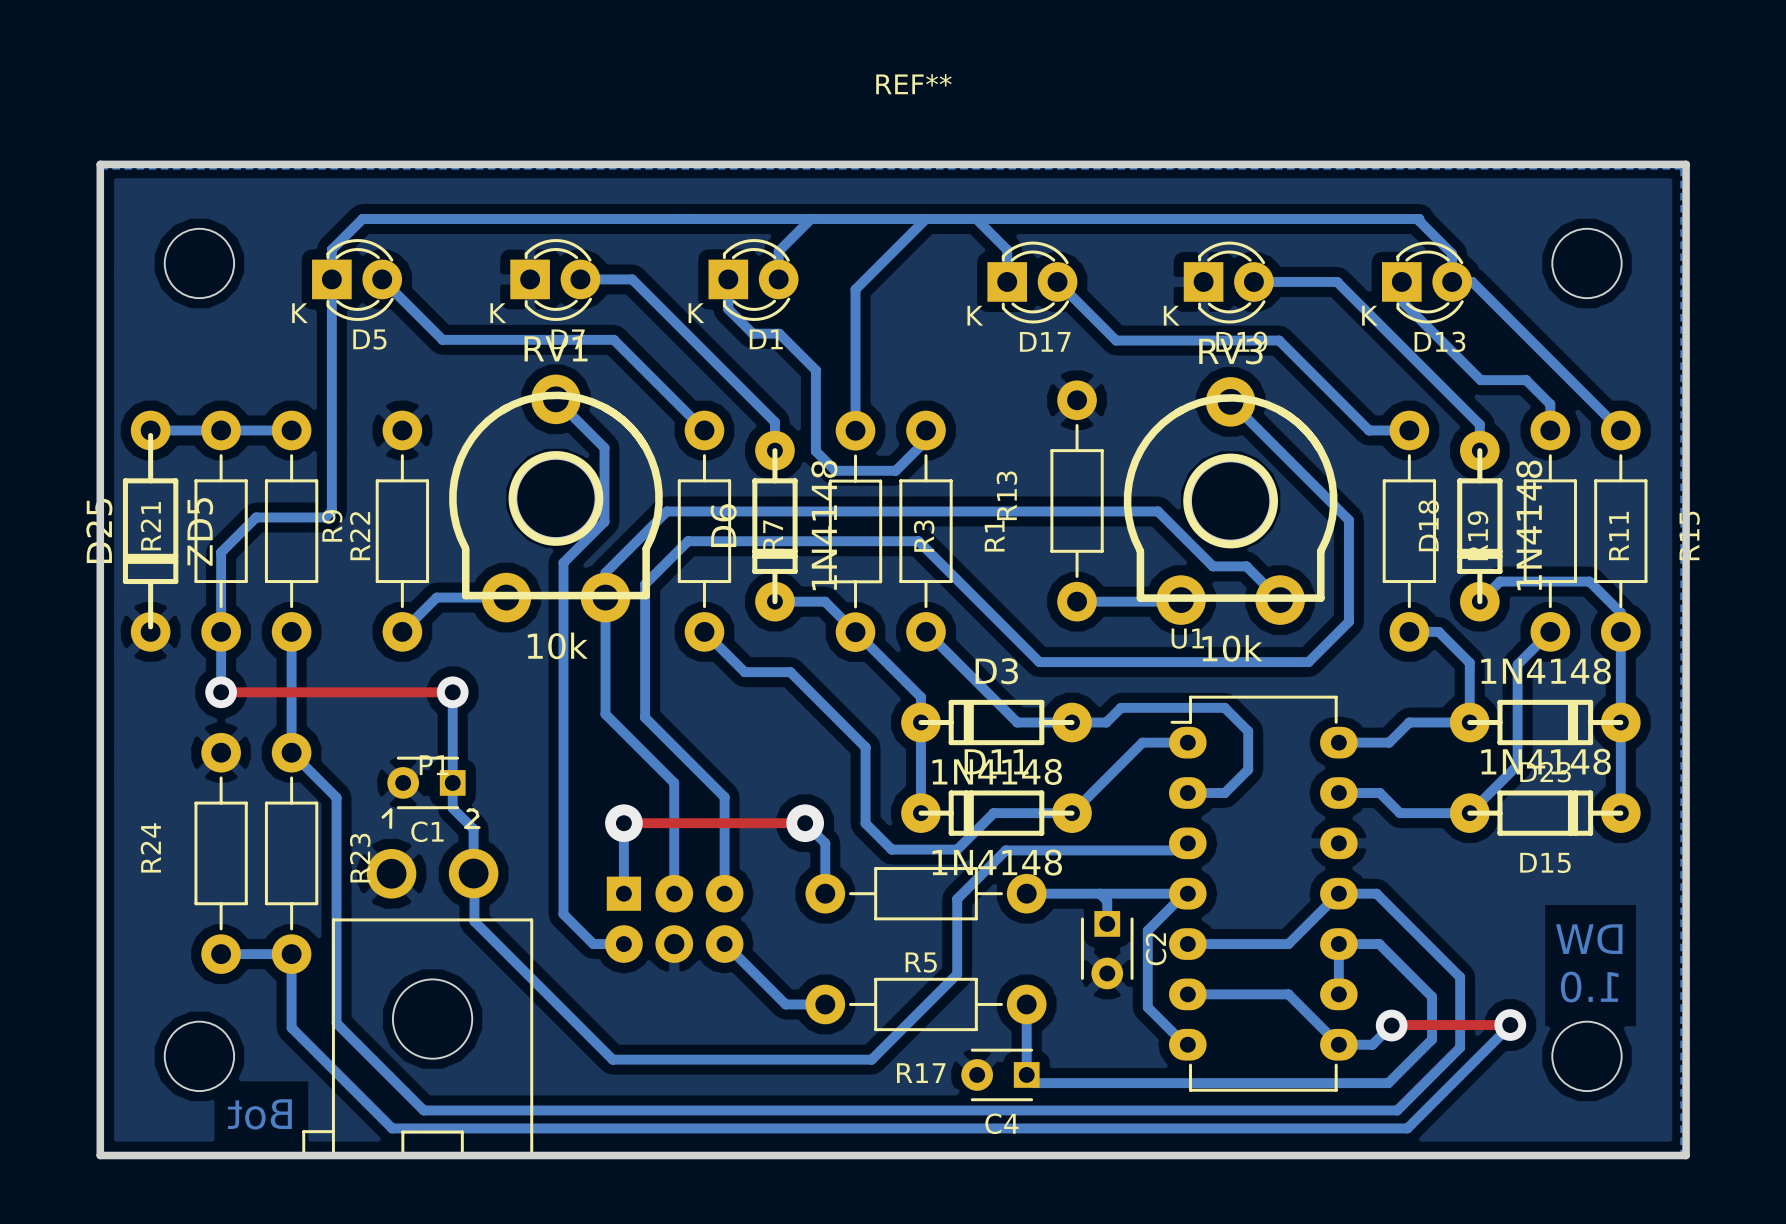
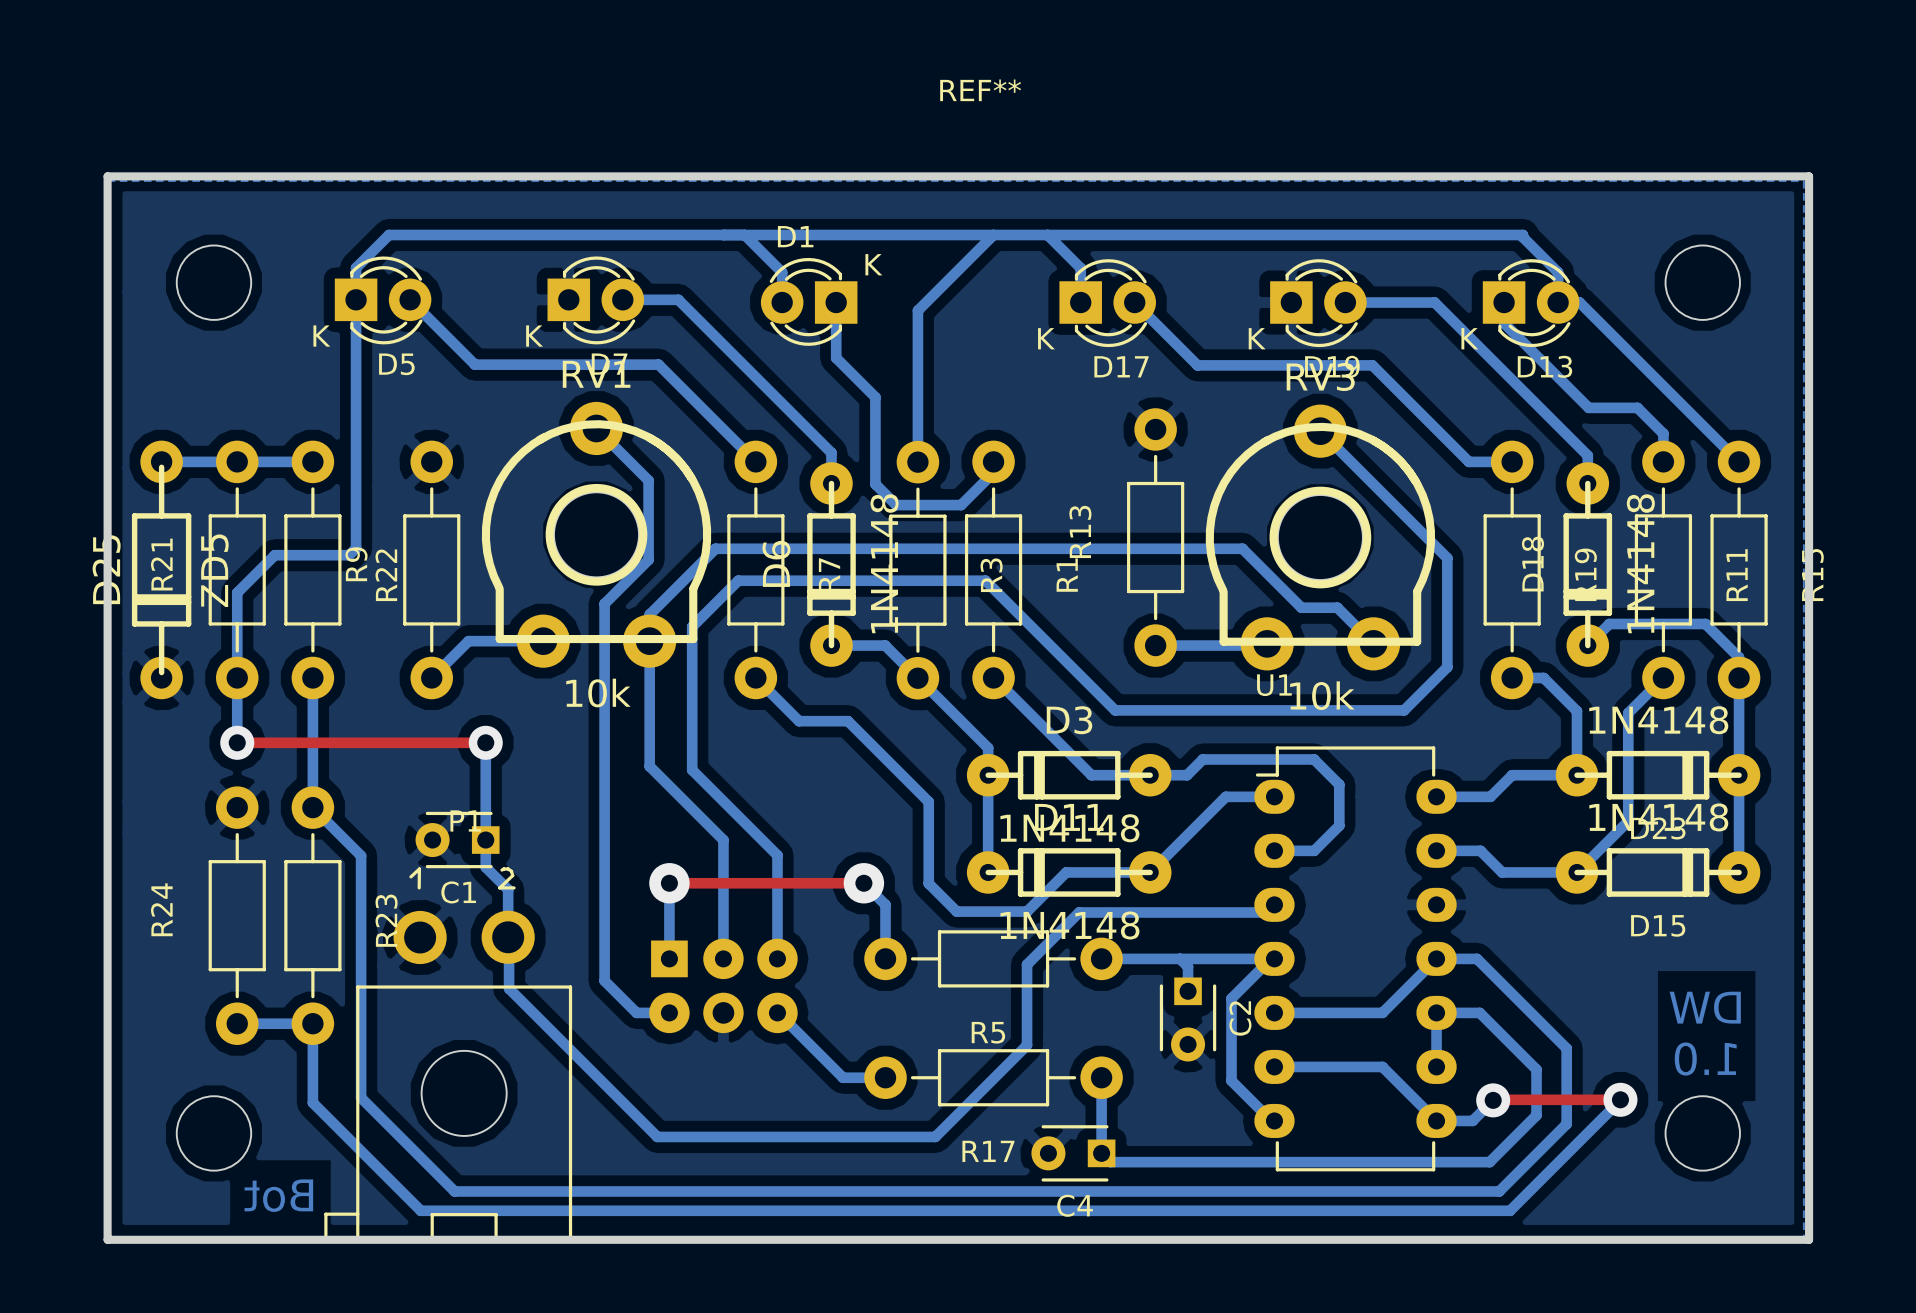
bottom track: none -> (744, 235) (782, 272) (782, 302)
bottom track: (811, 219) (778, 251) (778, 279) -> none
bottom track: (728, 279) (728, 309) (752, 333) (779, 333) -> (836, 302) (836, 358)
D1 rotation: 0° (753, 280) -> 180° (809, 301)

